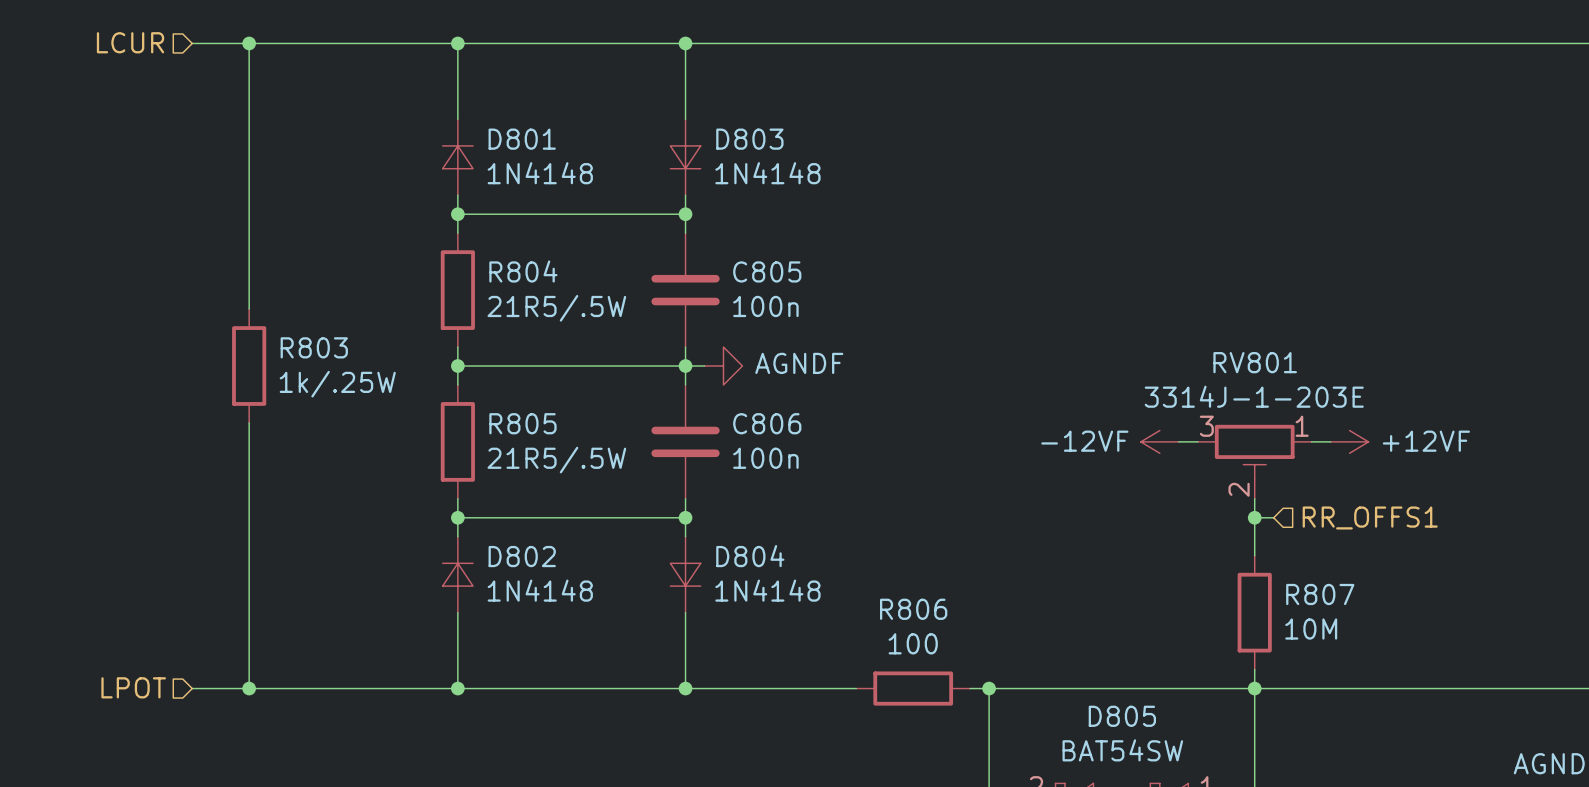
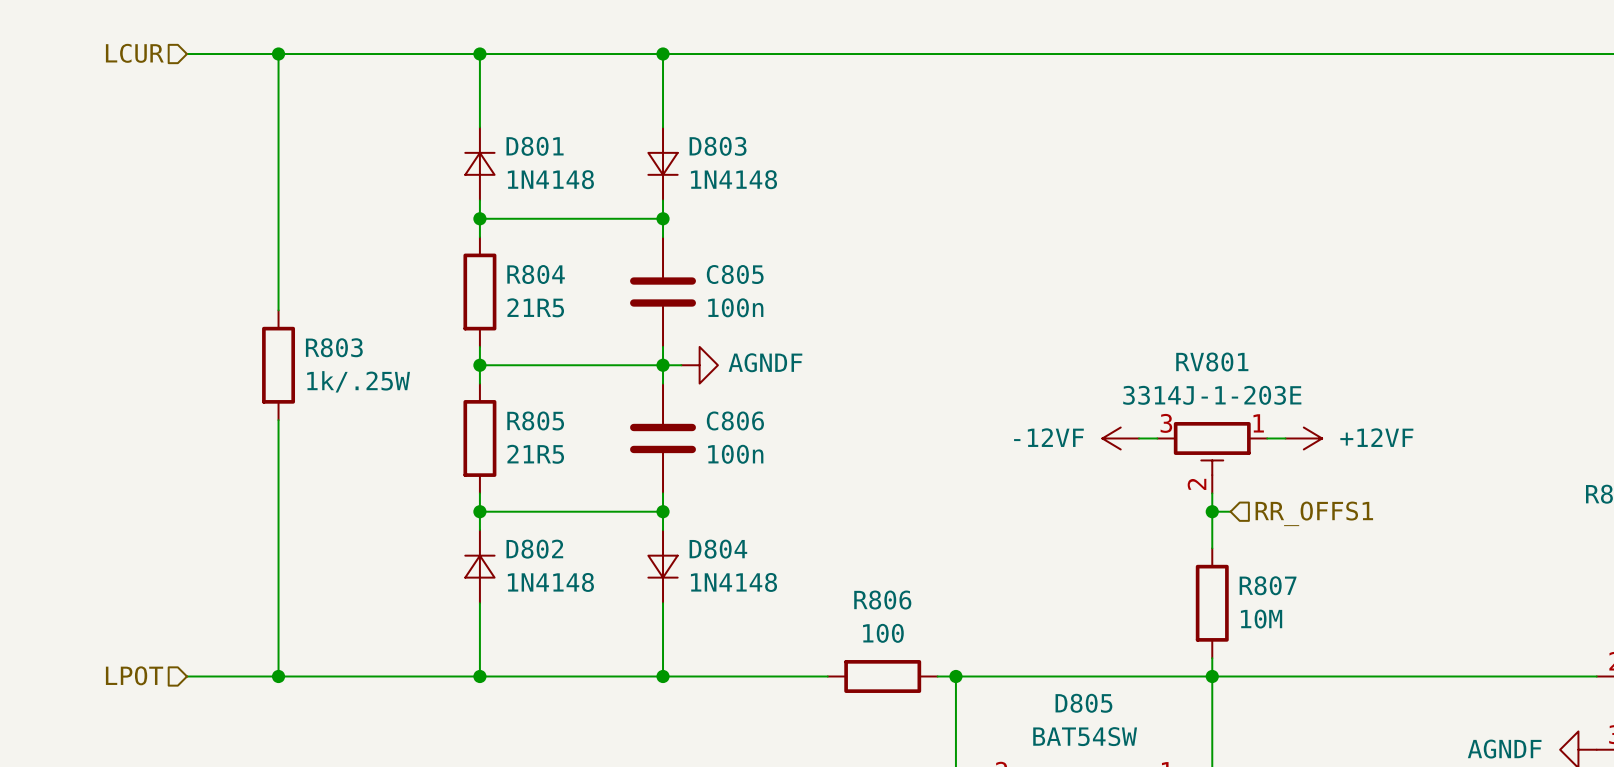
wire: (249, 43) (249, 309) -> (278, 54) (278, 310)
junction position: (249, 43) -> (278, 54)
wire: (457, 43) (457, 119) -> (479, 54) (479, 127)
junction position: (457, 43) -> (479, 54)
D801 position: (457, 157) -> (479, 163)
wire: (457, 195) (457, 233) -> (479, 200) (479, 237)
wire: (457, 214) (495, 214) -> none
junction position: (457, 214) -> (479, 218)
R804 position: (457, 290) -> (479, 292)
R804 value: 21R5/.5W (556, 308) -> 21R5 (535, 307)
wire: (457, 347) (457, 384) -> (479, 346) (479, 383)
R803 position: (249, 366) -> (278, 365)
wire: (457, 366) (495, 366) -> none
junction position: (457, 366) -> (479, 365)
wire: (249, 422) (249, 688) -> (278, 420) (278, 676)
R805 position: (457, 441) -> (479, 438)
R805 value: 21R5/.5W (556, 460) -> 21R5 (535, 454)
wire: (457, 498) (457, 536) -> (479, 493) (479, 530)
wire: (457, 517) (495, 517) -> none
junction position: (457, 517) -> (479, 511)
D802 position: (457, 574) -> (479, 566)
wire: (457, 612) (457, 688) -> (479, 603) (479, 676)
junction position: (249, 688) -> (278, 676)
junction position: (457, 688) -> (479, 676)

